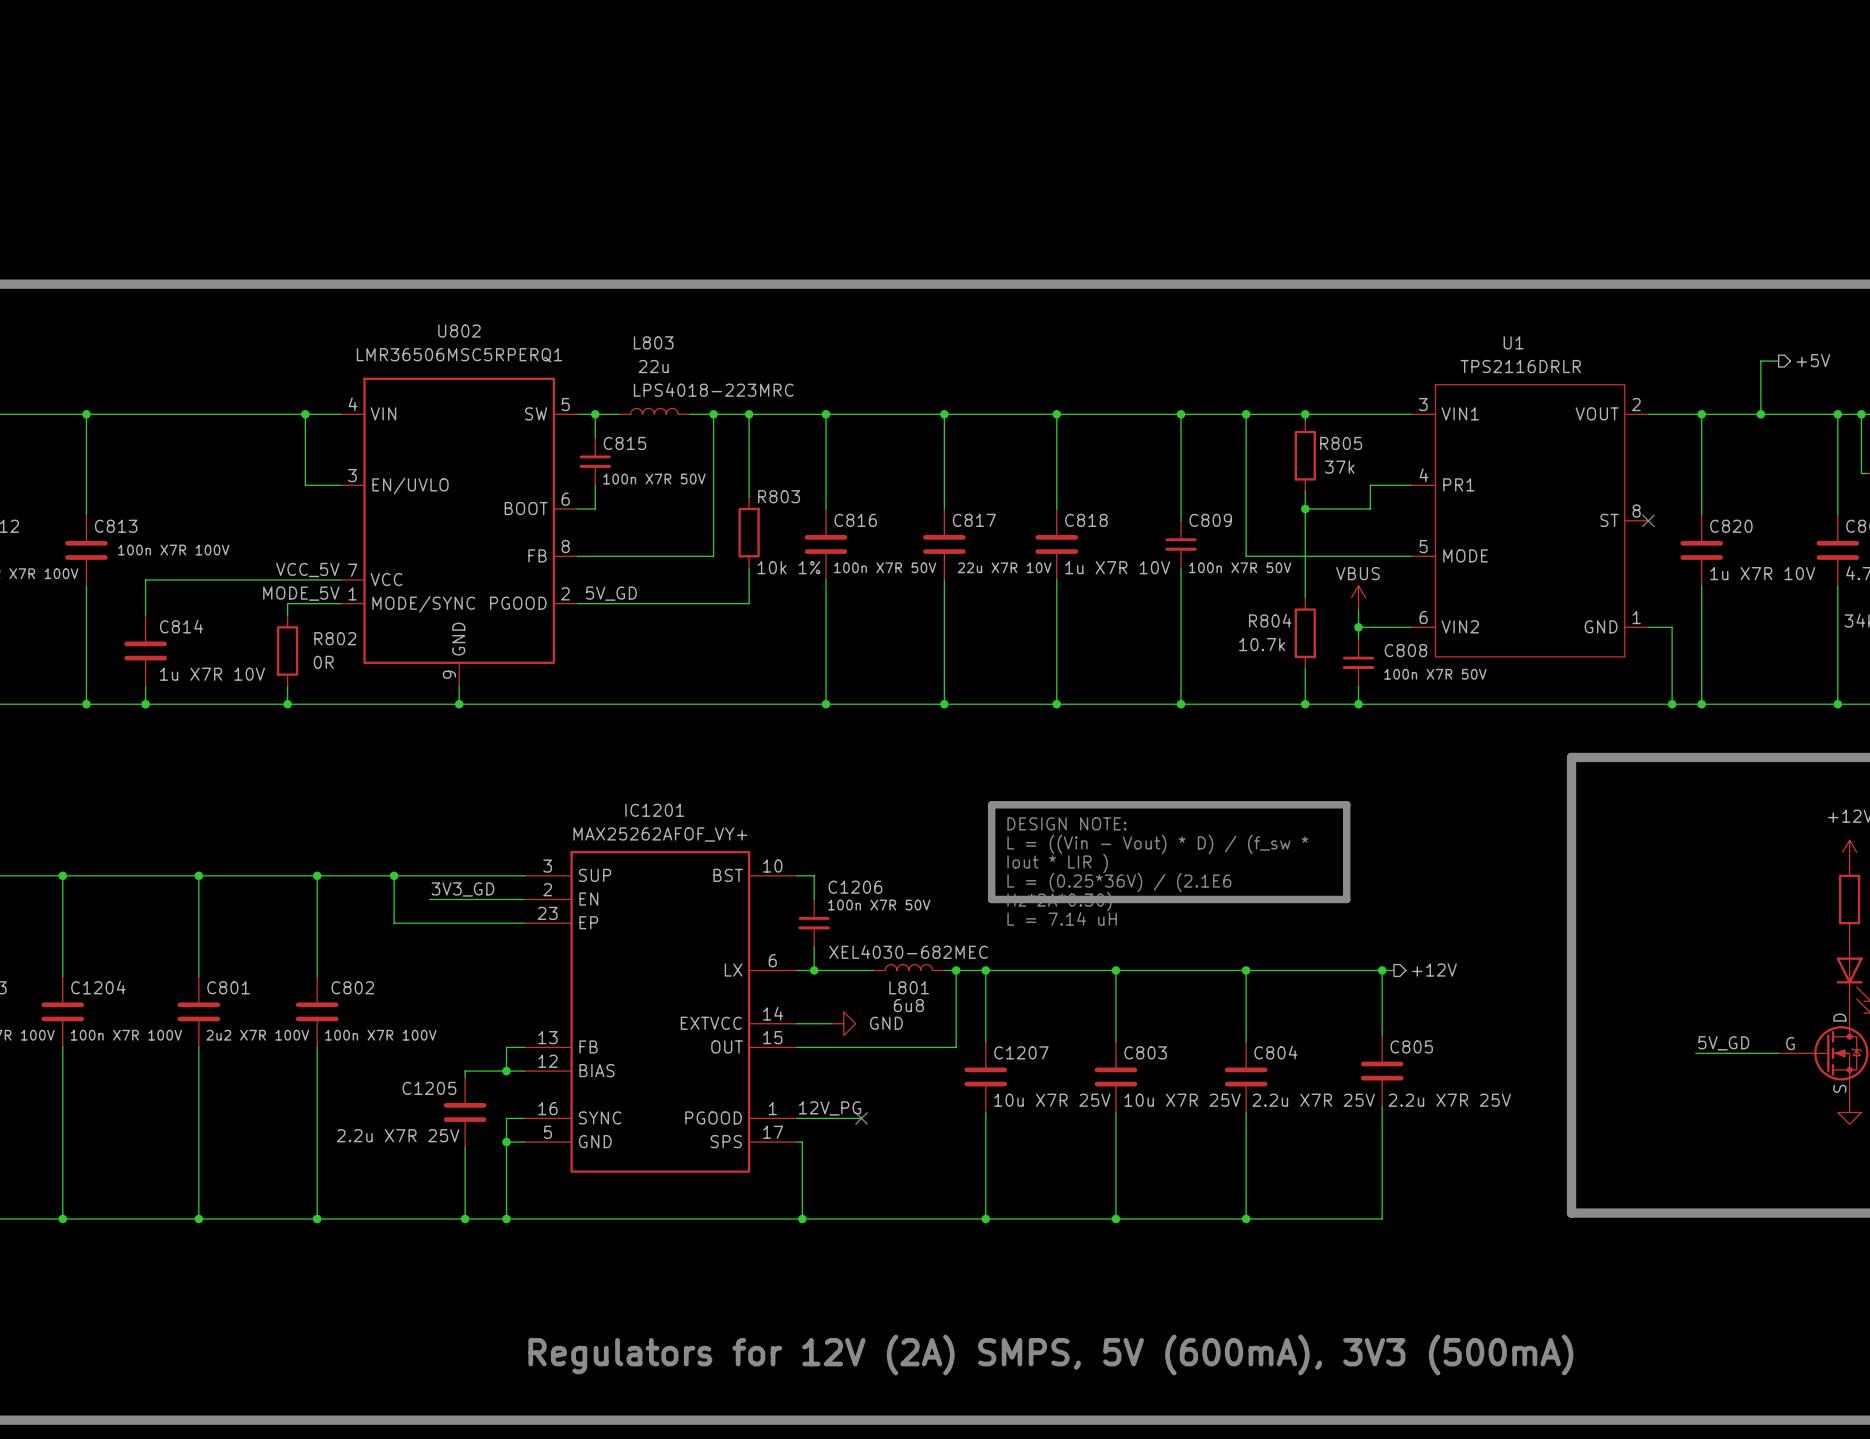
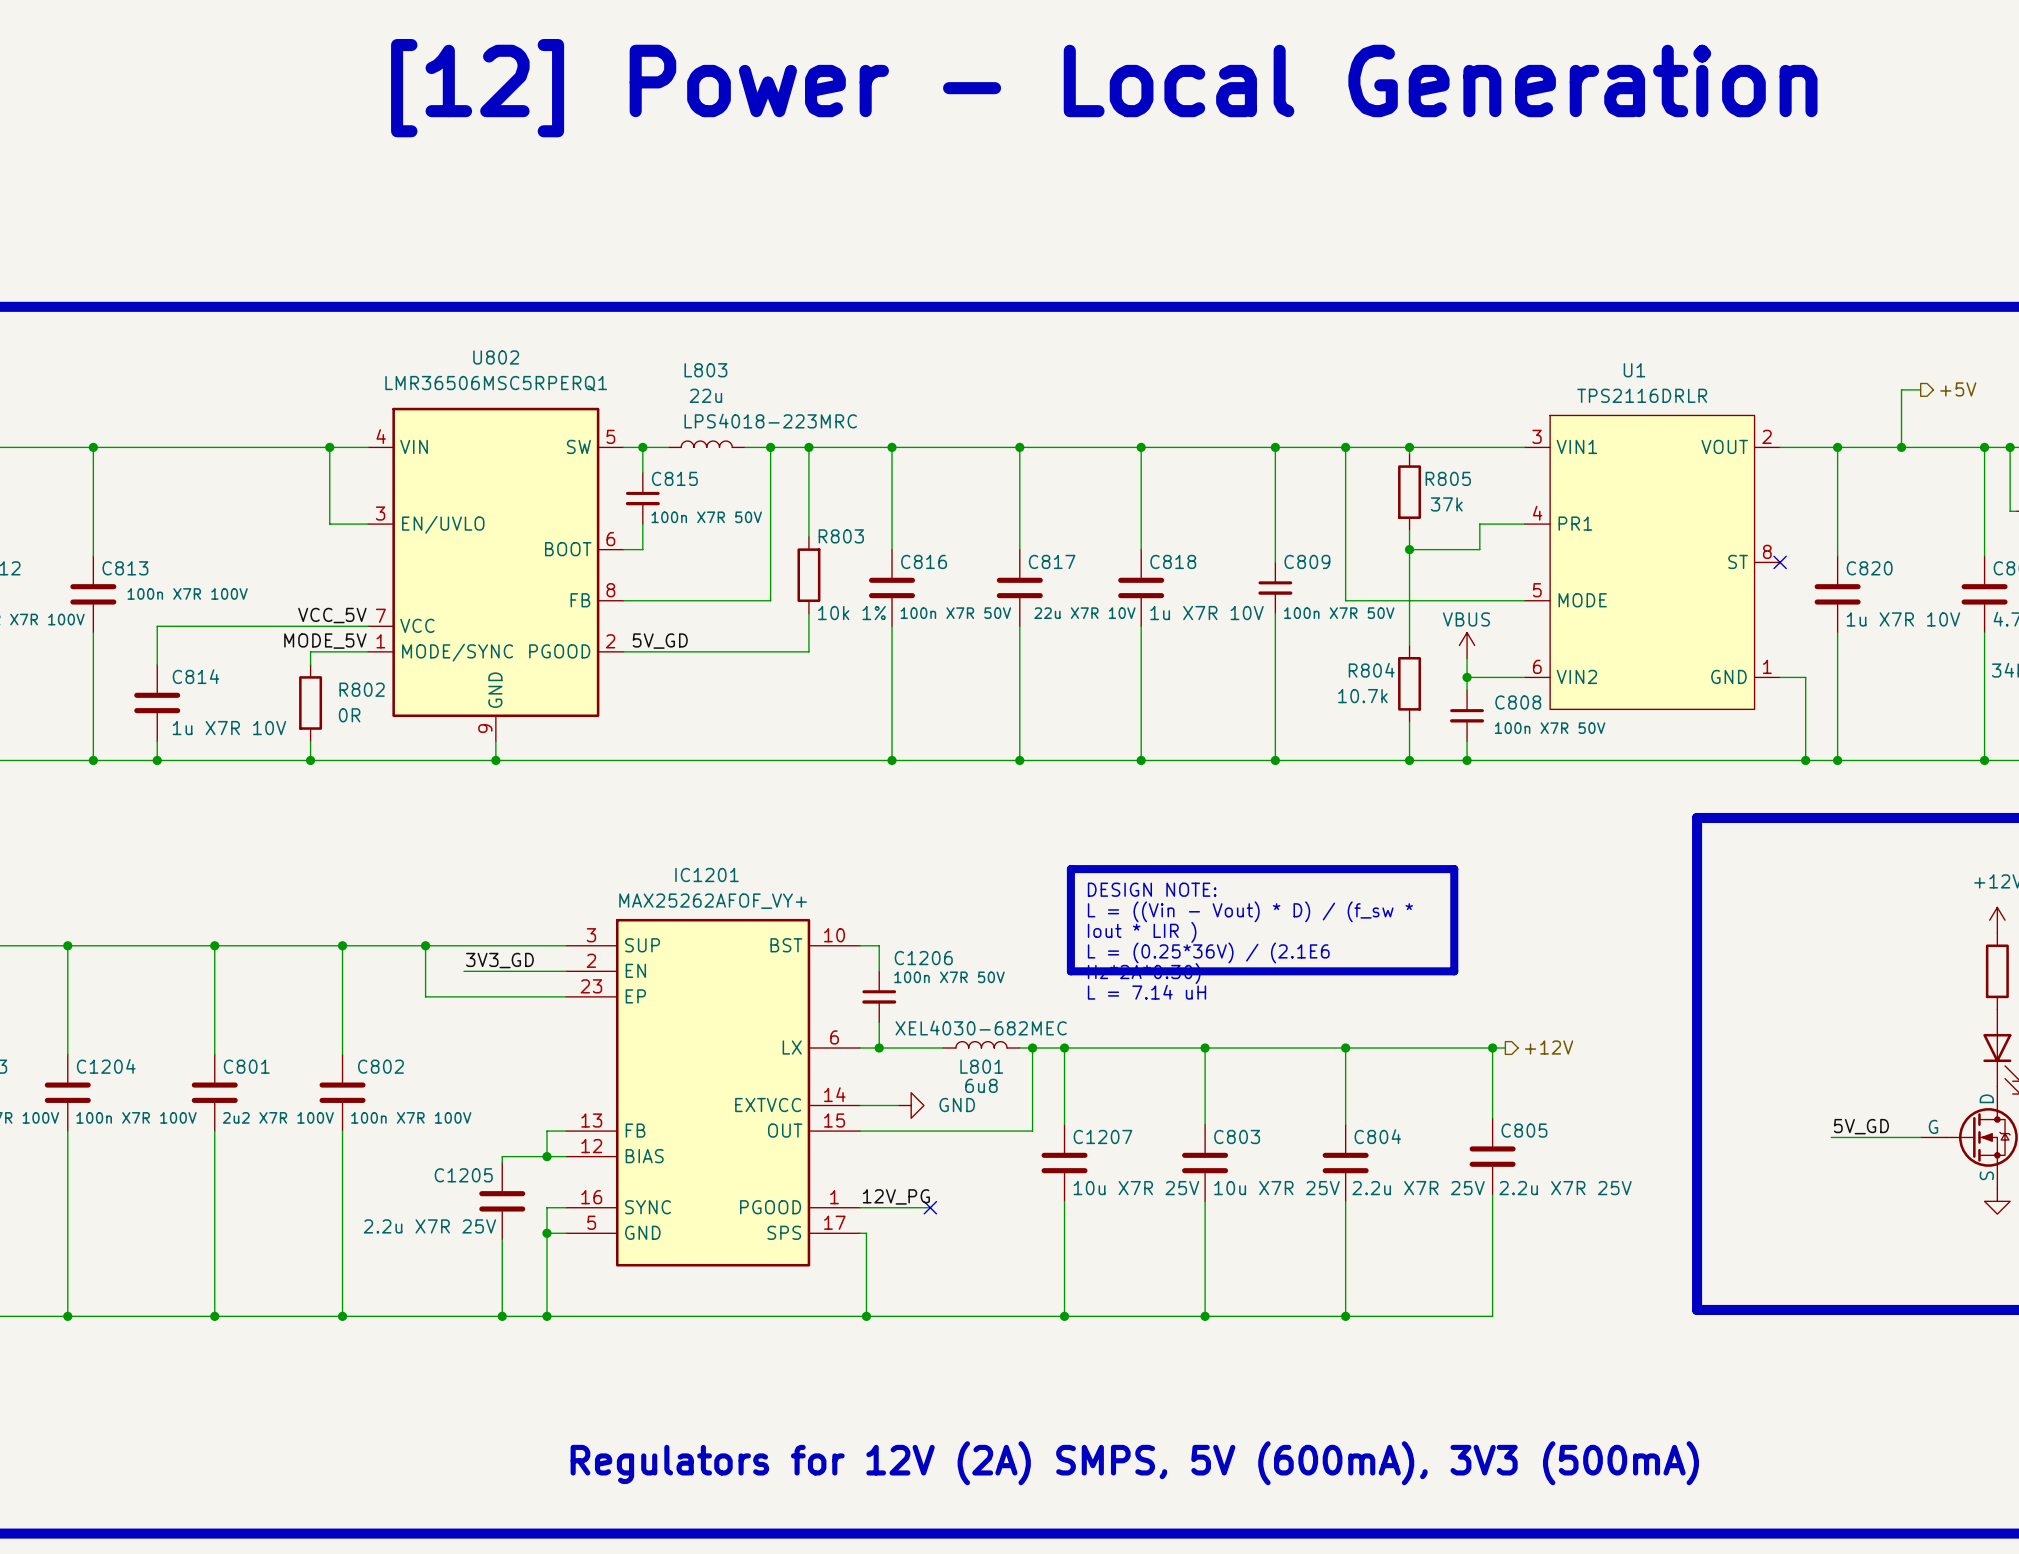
text: none -> [12] Power - Local Generation (1104, 88)

